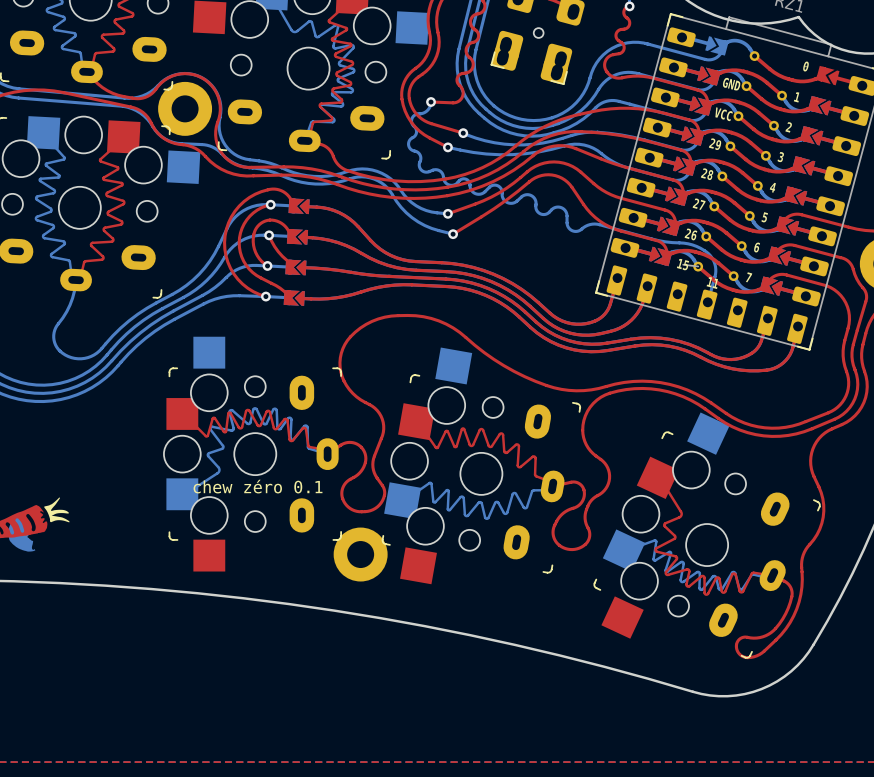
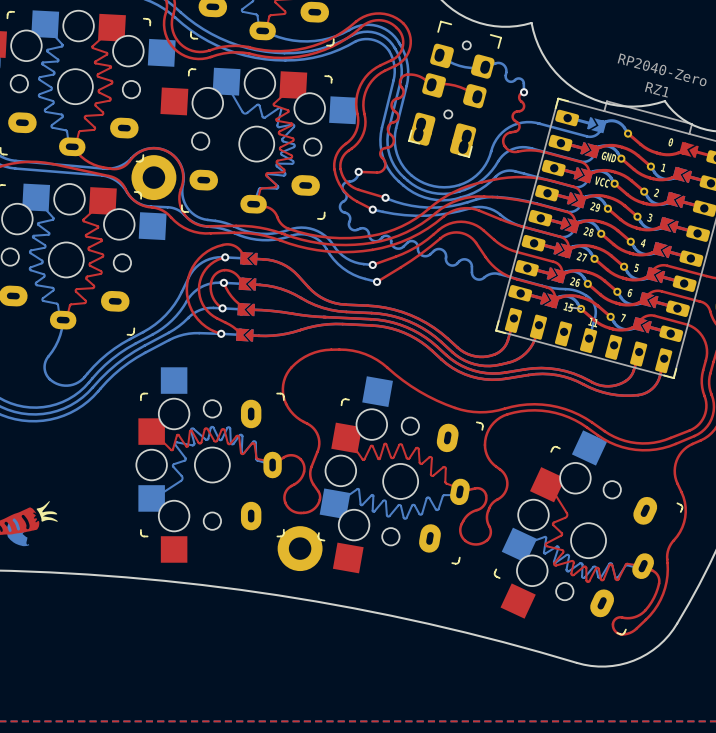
text: chew zéro 0.1 (258, 486) -> none

